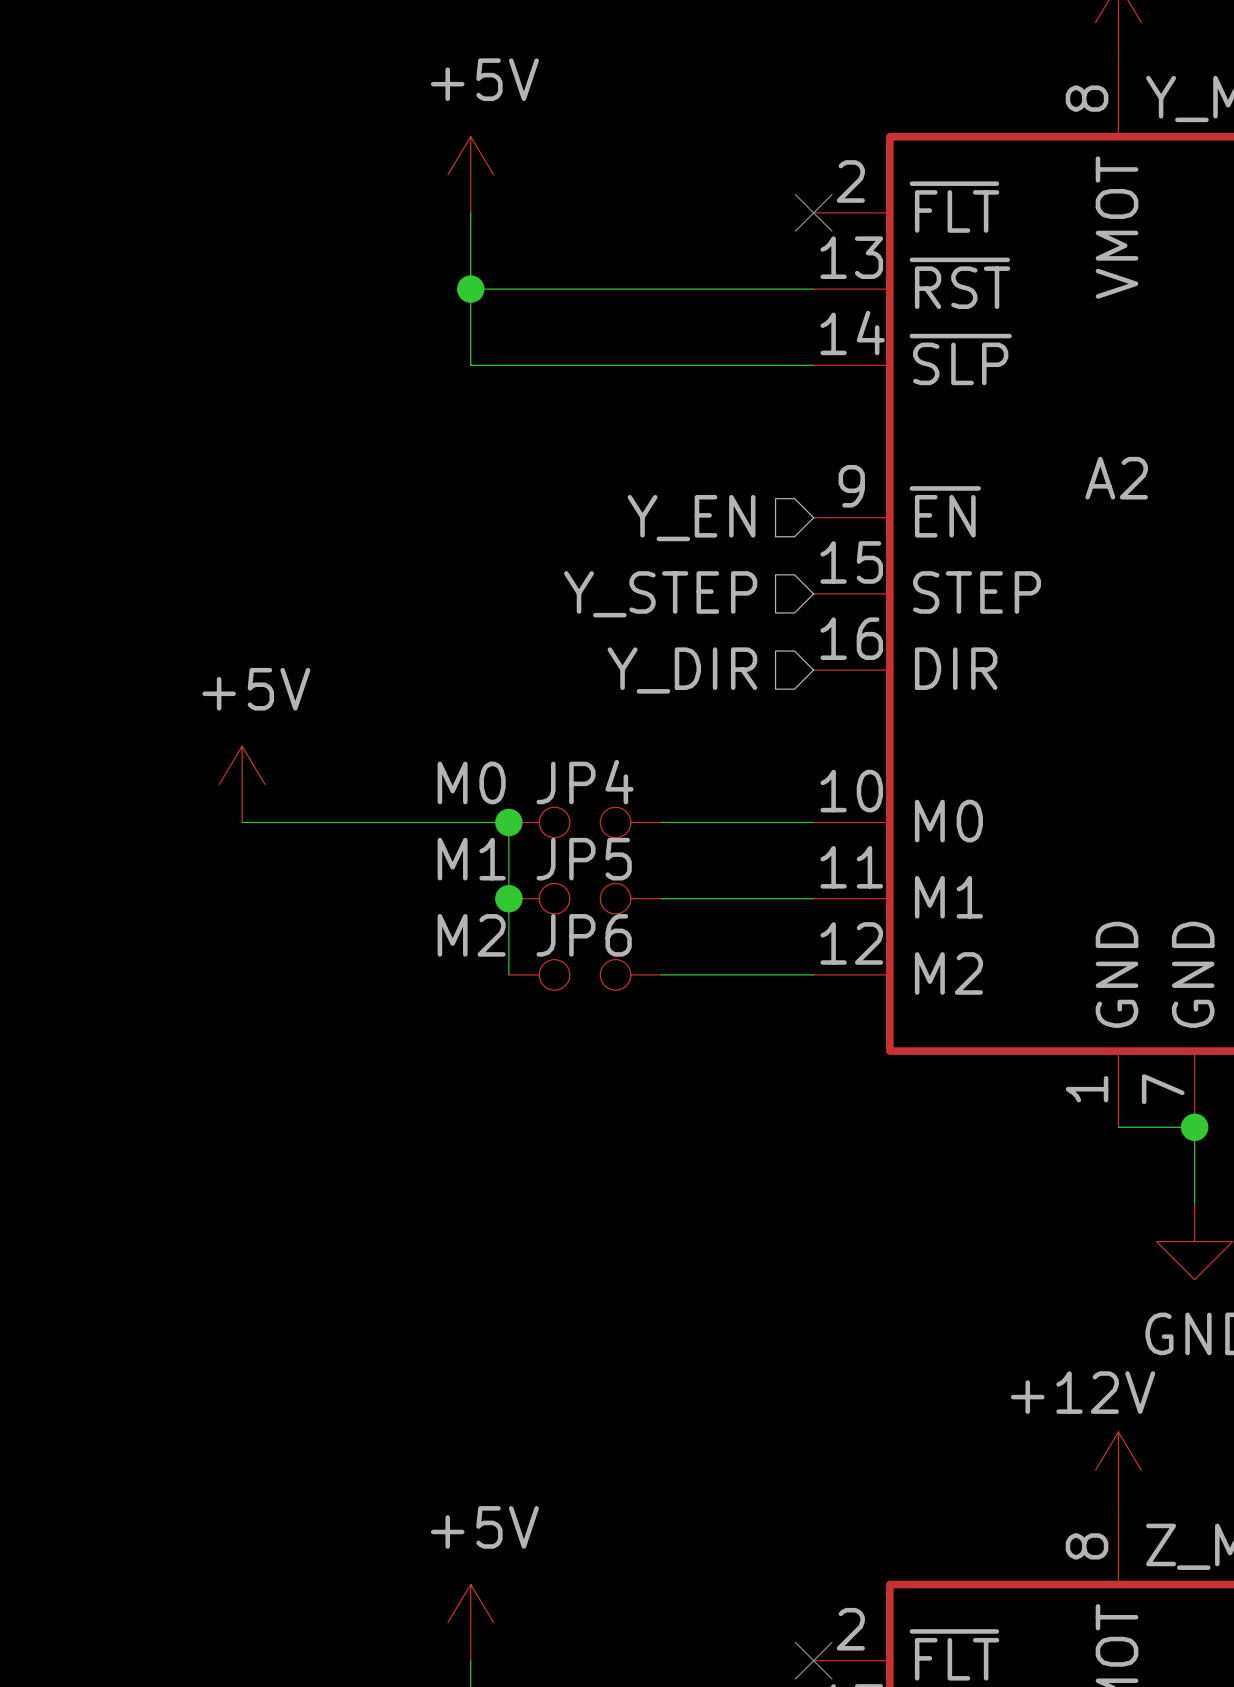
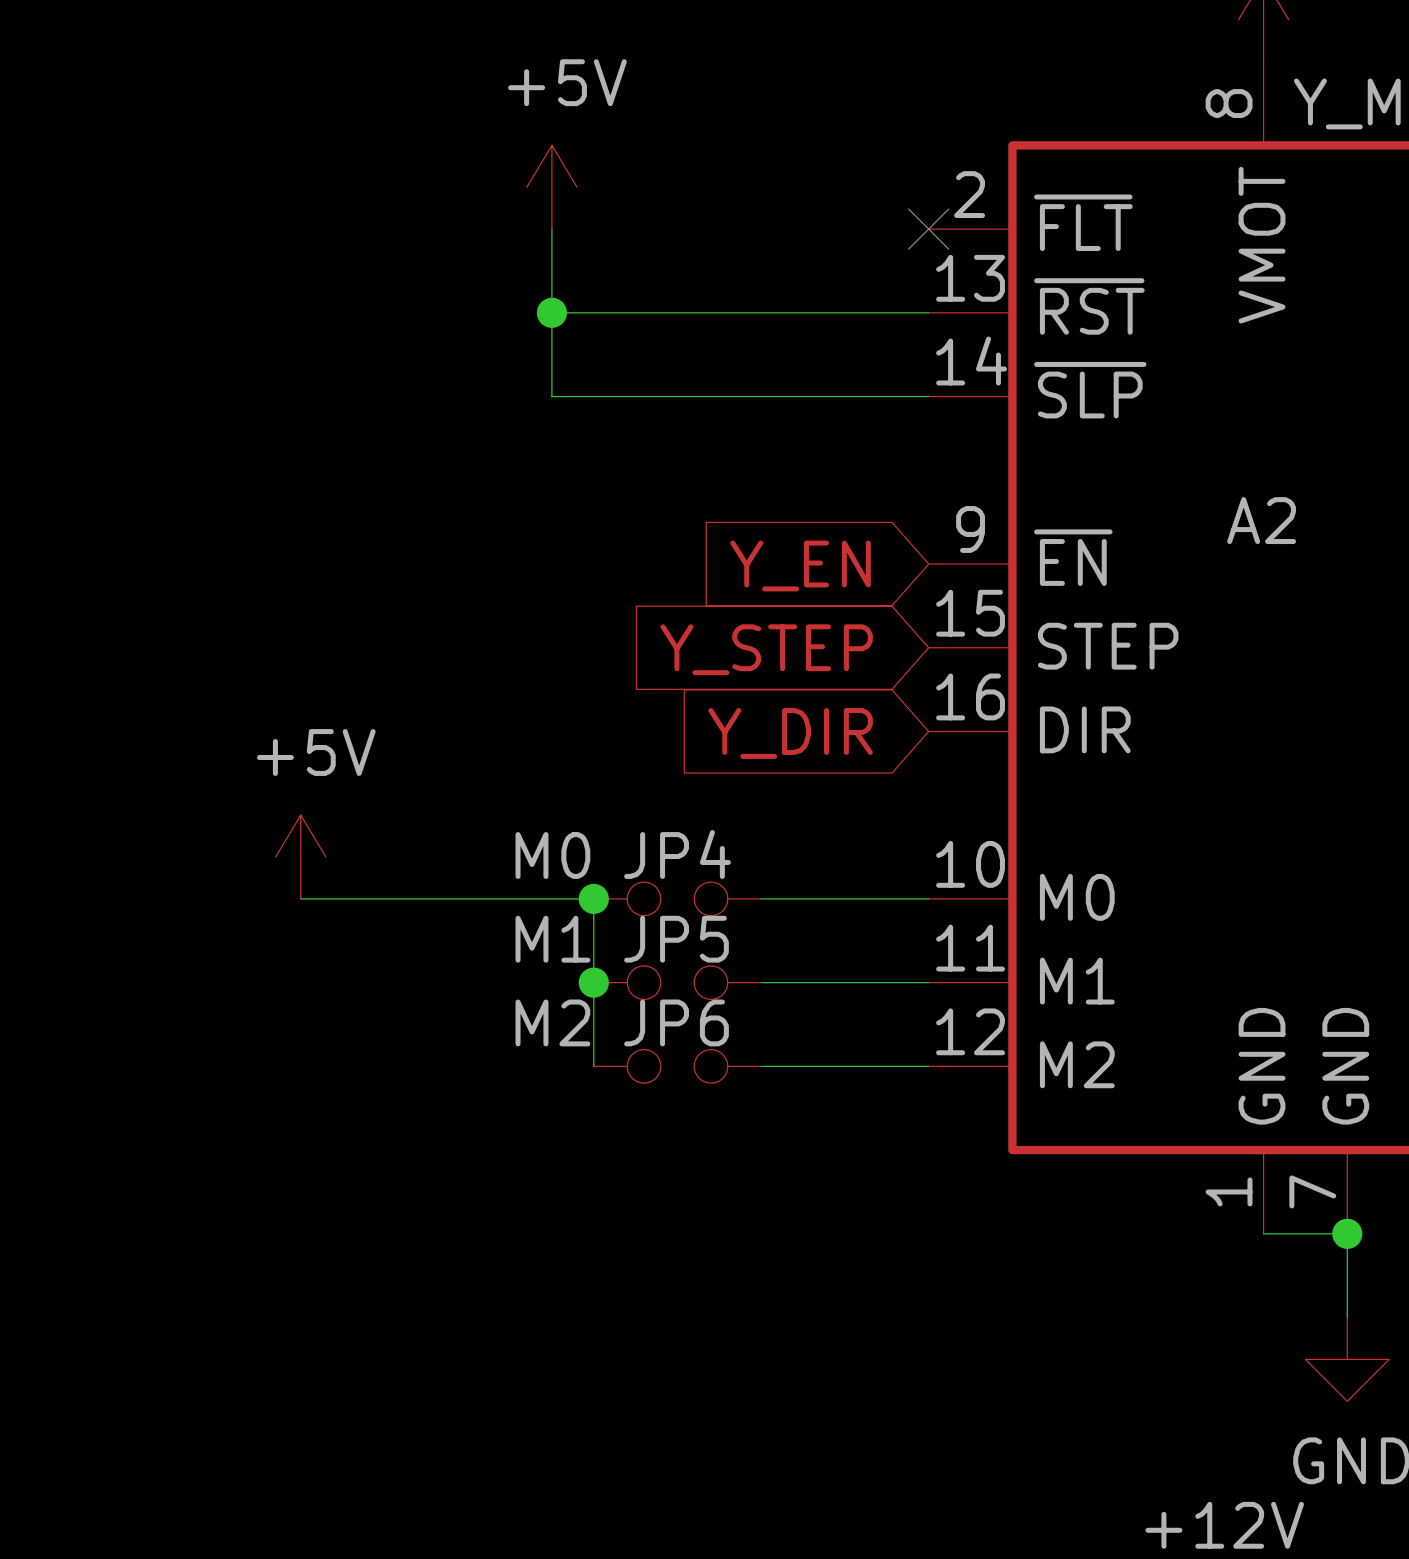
hierarchical label: Y_EN (691, 518) -> none
global label: none -> Y_EN (800, 566)
hierarchical label: Y_STEP (660, 594) -> none
global label: none -> Y_STEP (766, 649)
hierarchical label: Y_DIR (682, 670) -> none
global label: none -> Y_DIR (790, 733)

